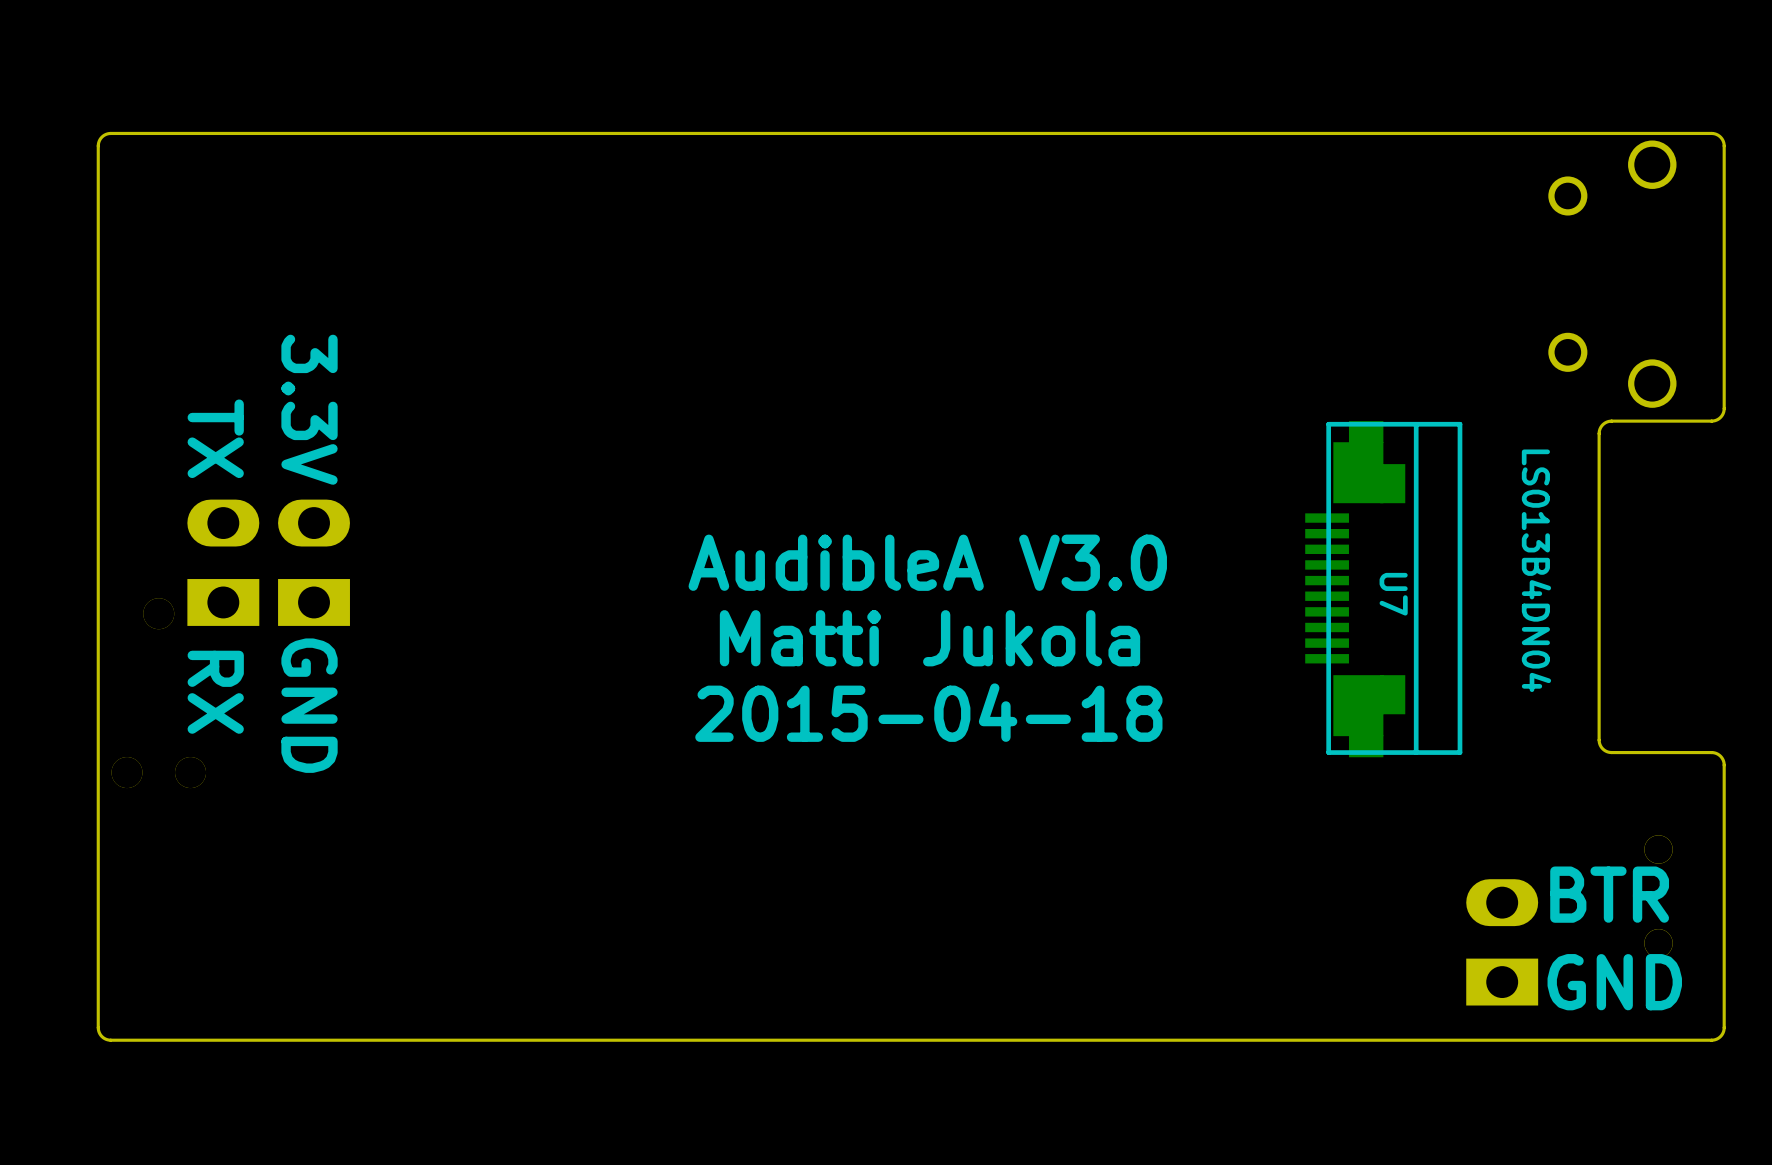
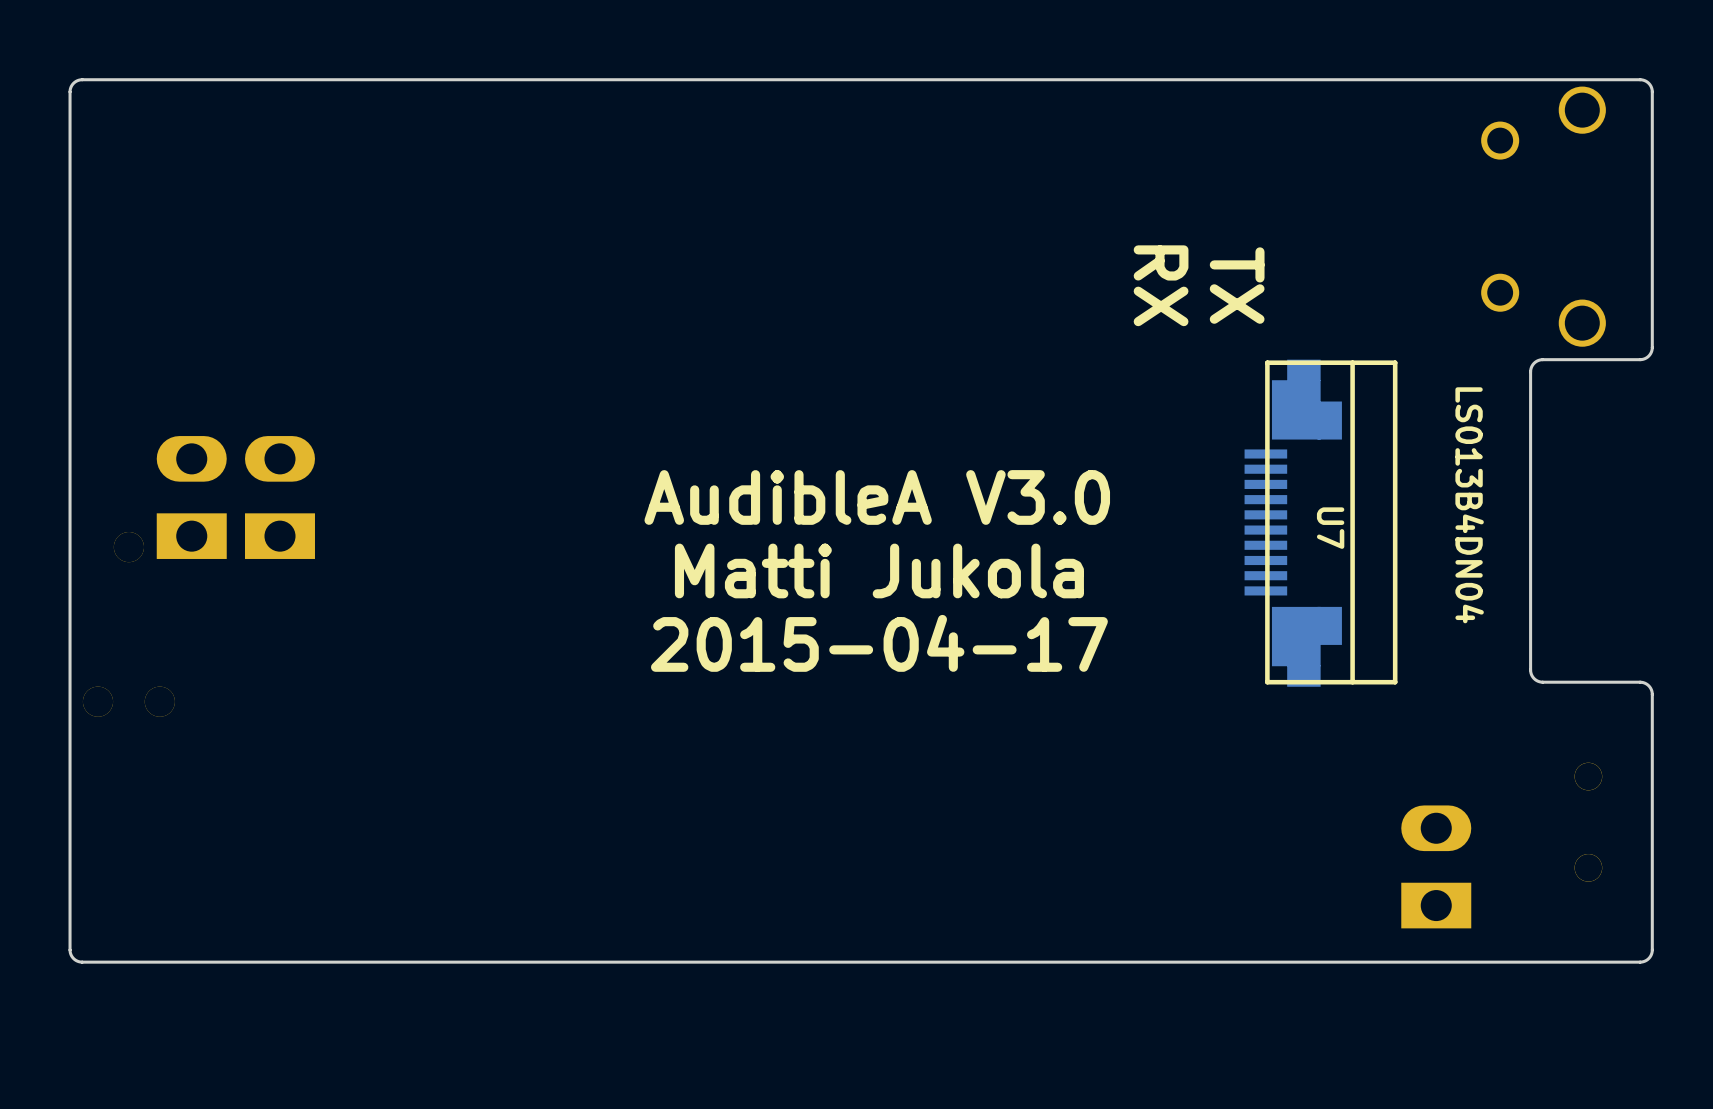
text: none -> TX (1237, 285)
text: none -> RX (1161, 285)
text: 3.3V (309, 409) -> none
text: TX (215, 438) -> none
text: RX (215, 692) -> none
text: GND (309, 705) -> none
text: 2015-04-18 (928, 712) -> 2015-04-17 (879, 643)
text: BTR (1609, 894) -> none
text: GND (1614, 982) -> none

